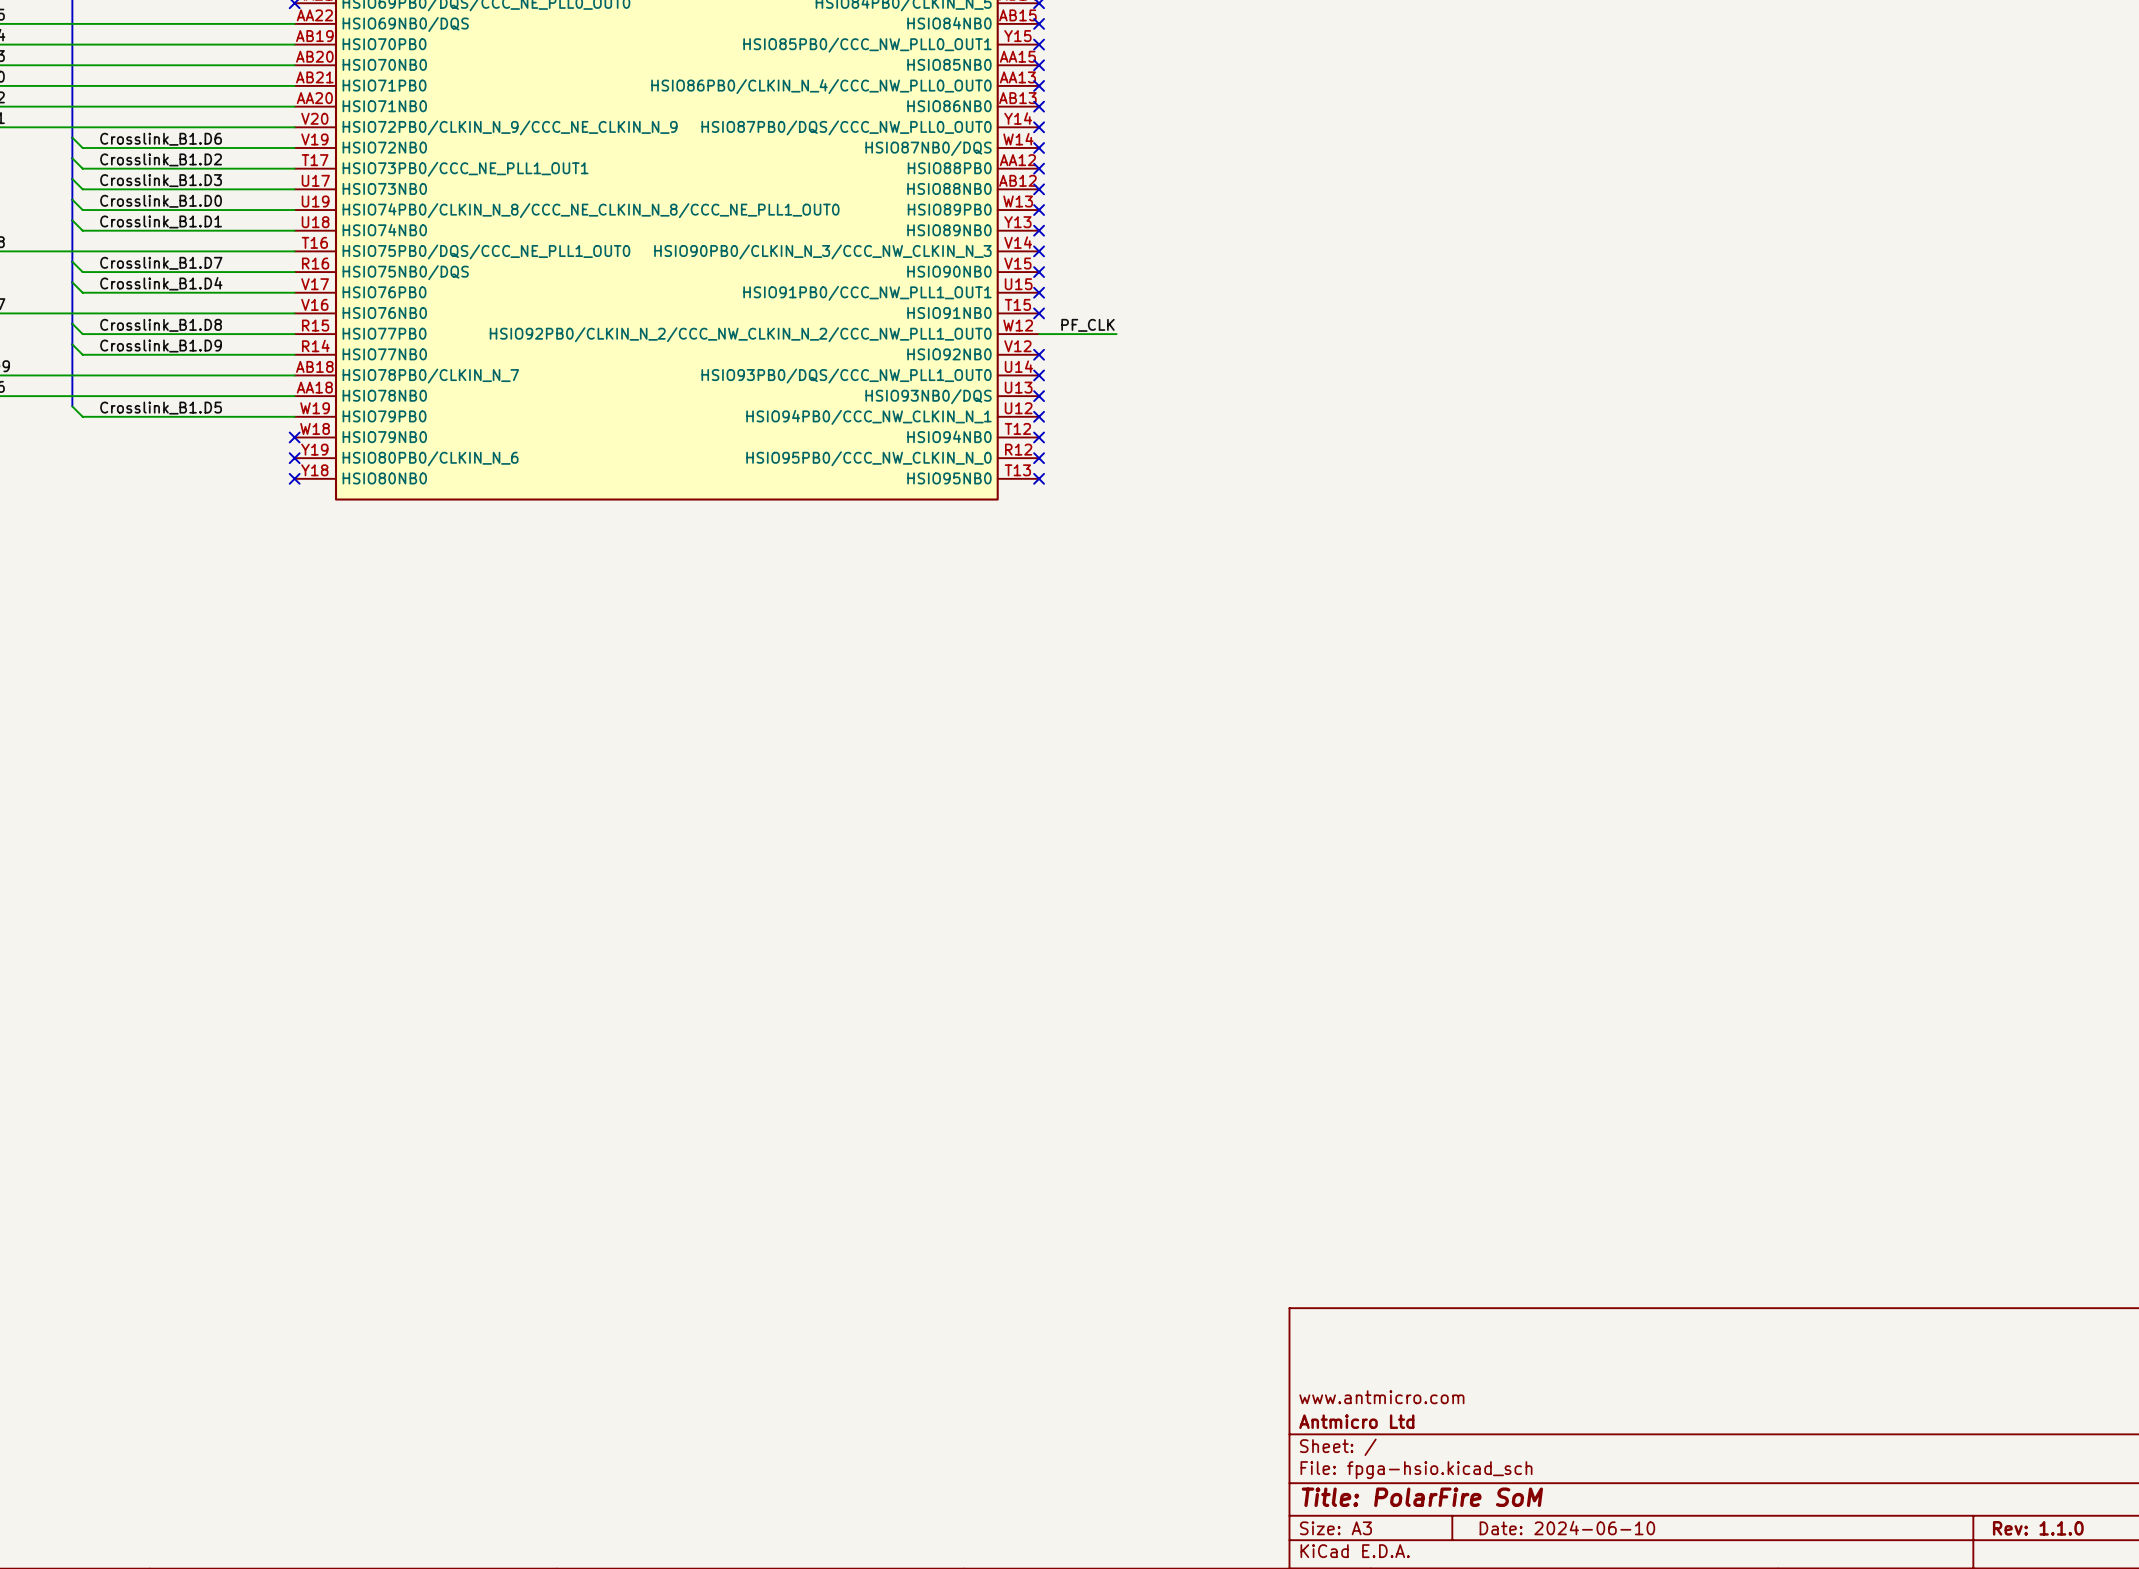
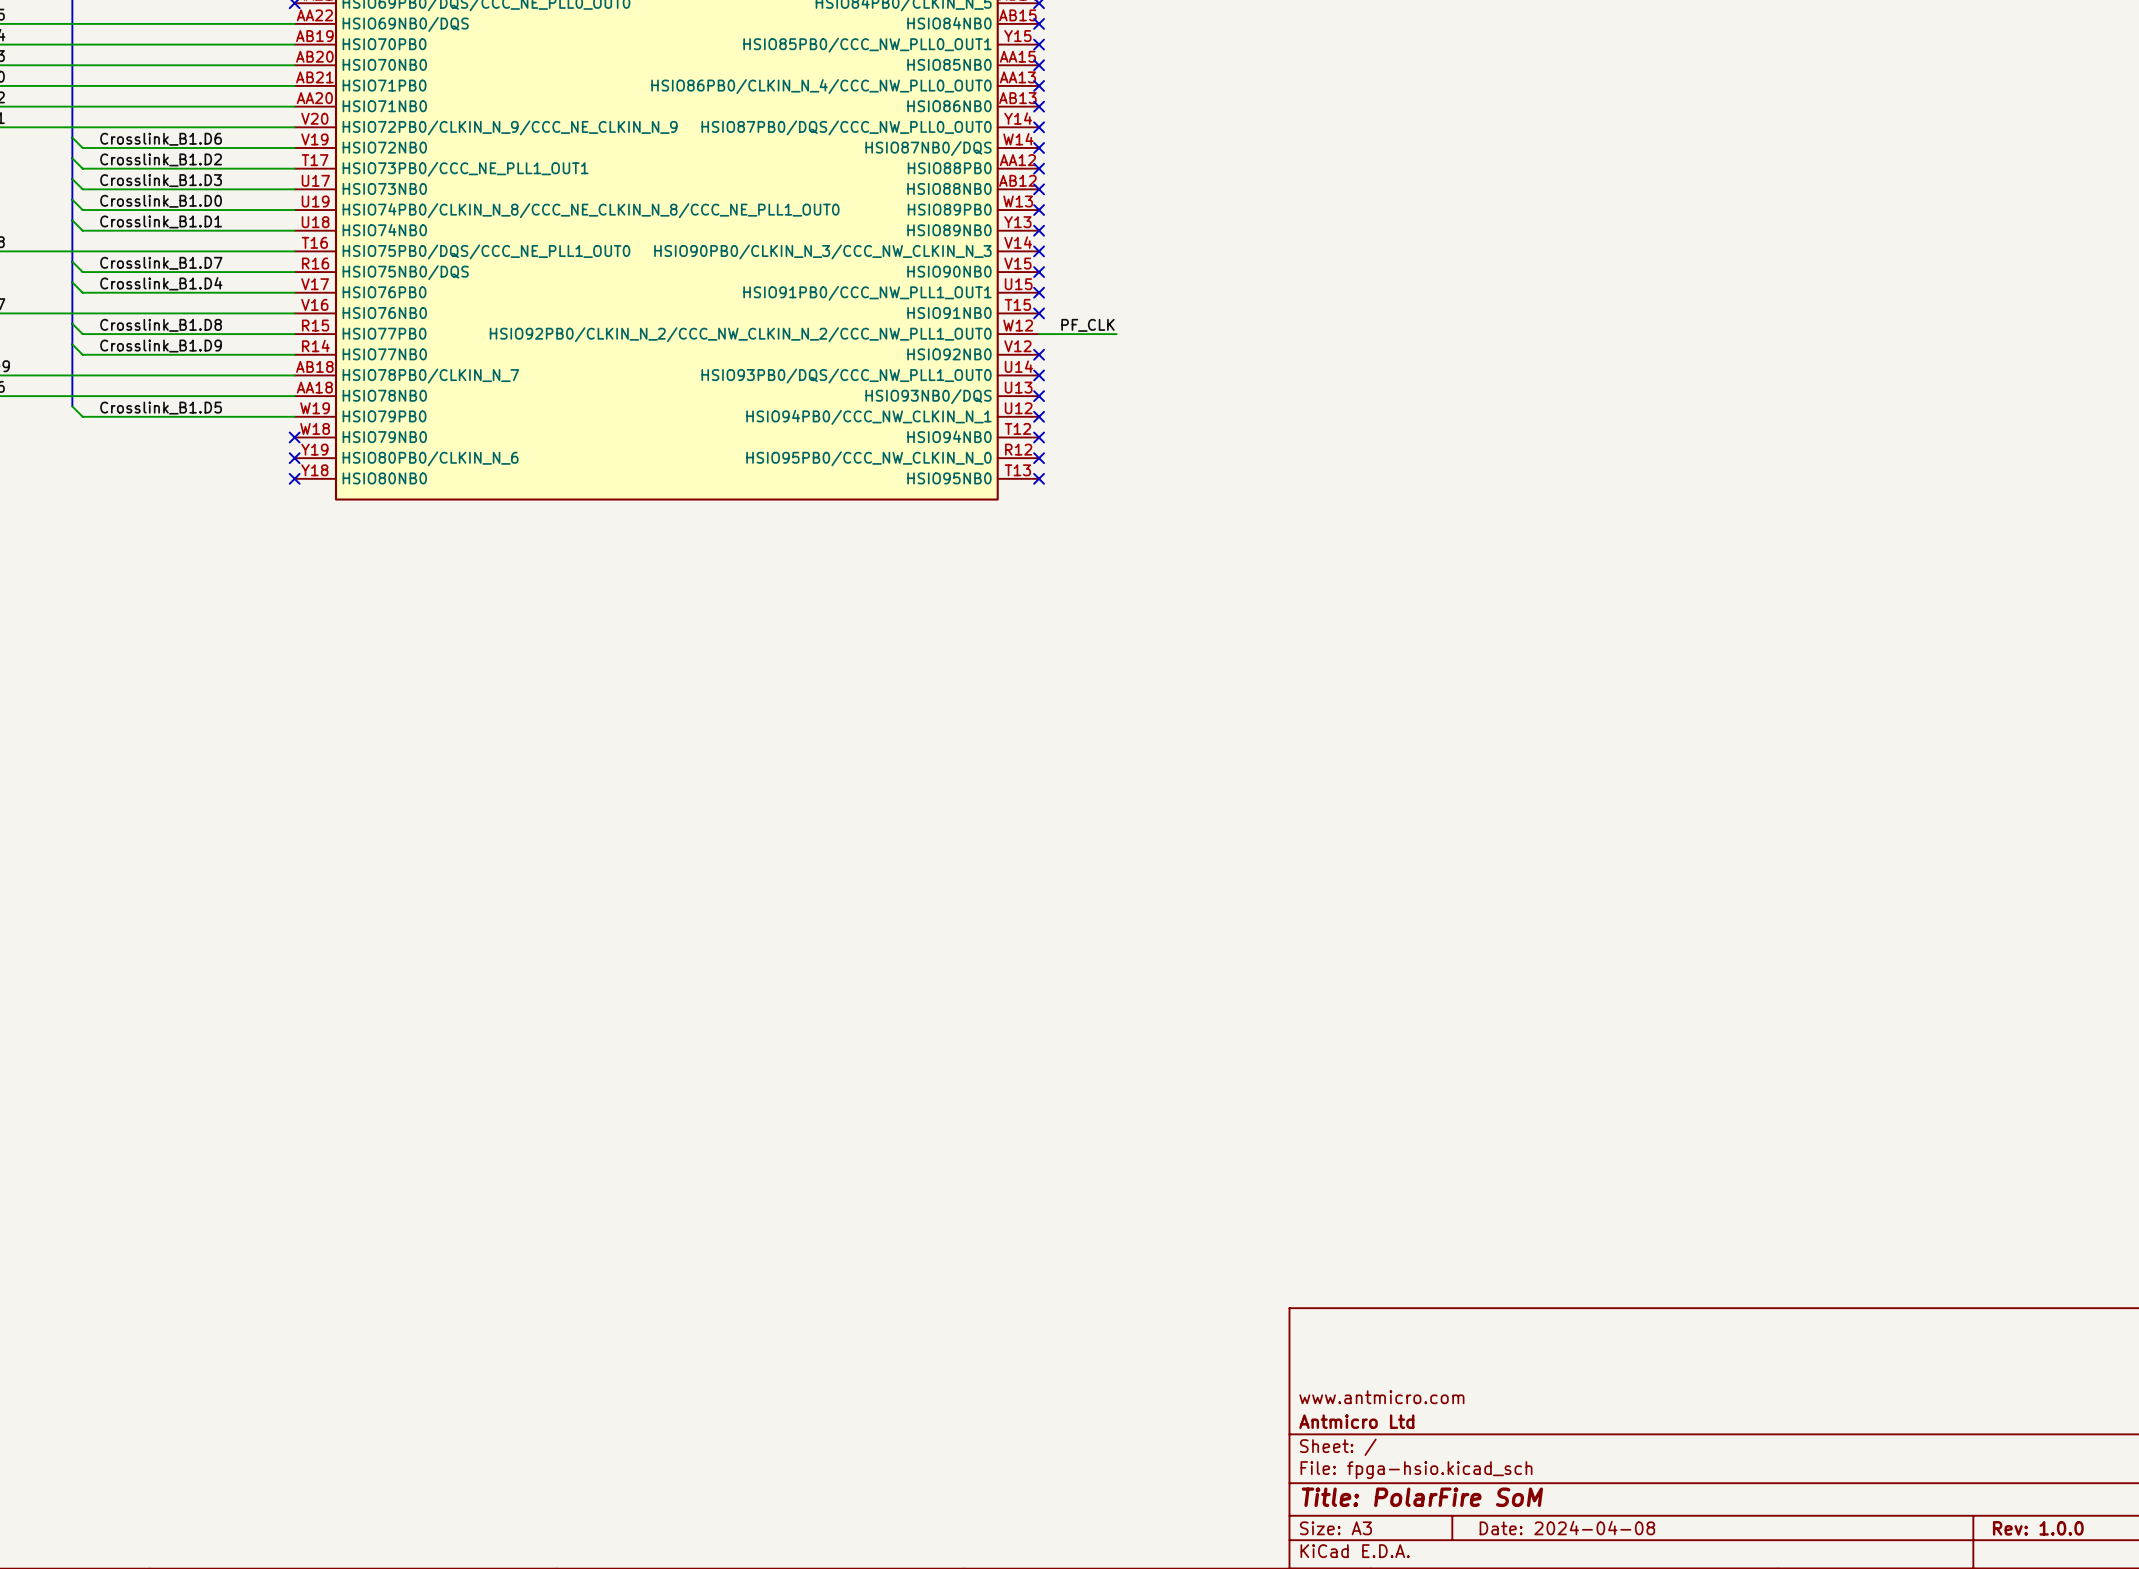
title block: Date: 2024-06-10 (1567, 1528) -> Date: 2024-04-08 (1567, 1528)
title block: Rev: 1.1.0 (2038, 1528) -> Rev: 1.0.0 (2038, 1528)

